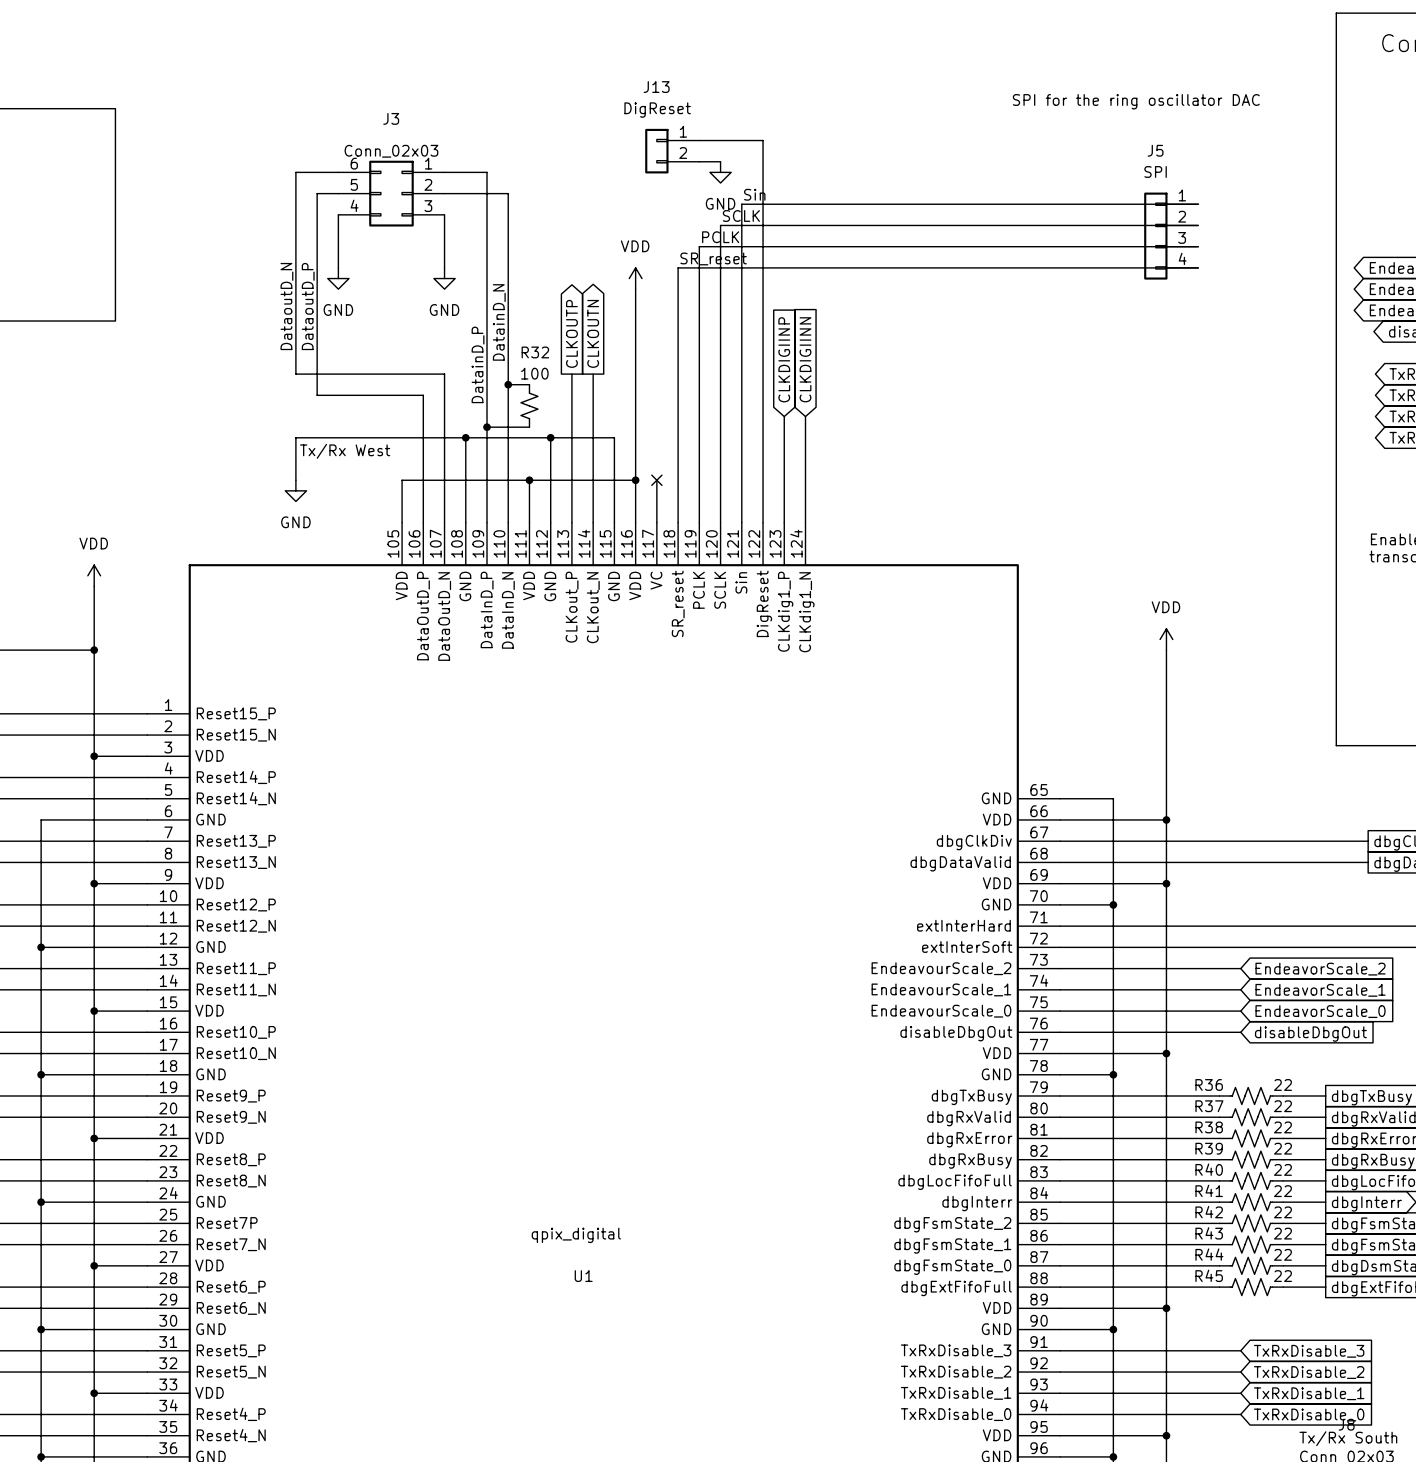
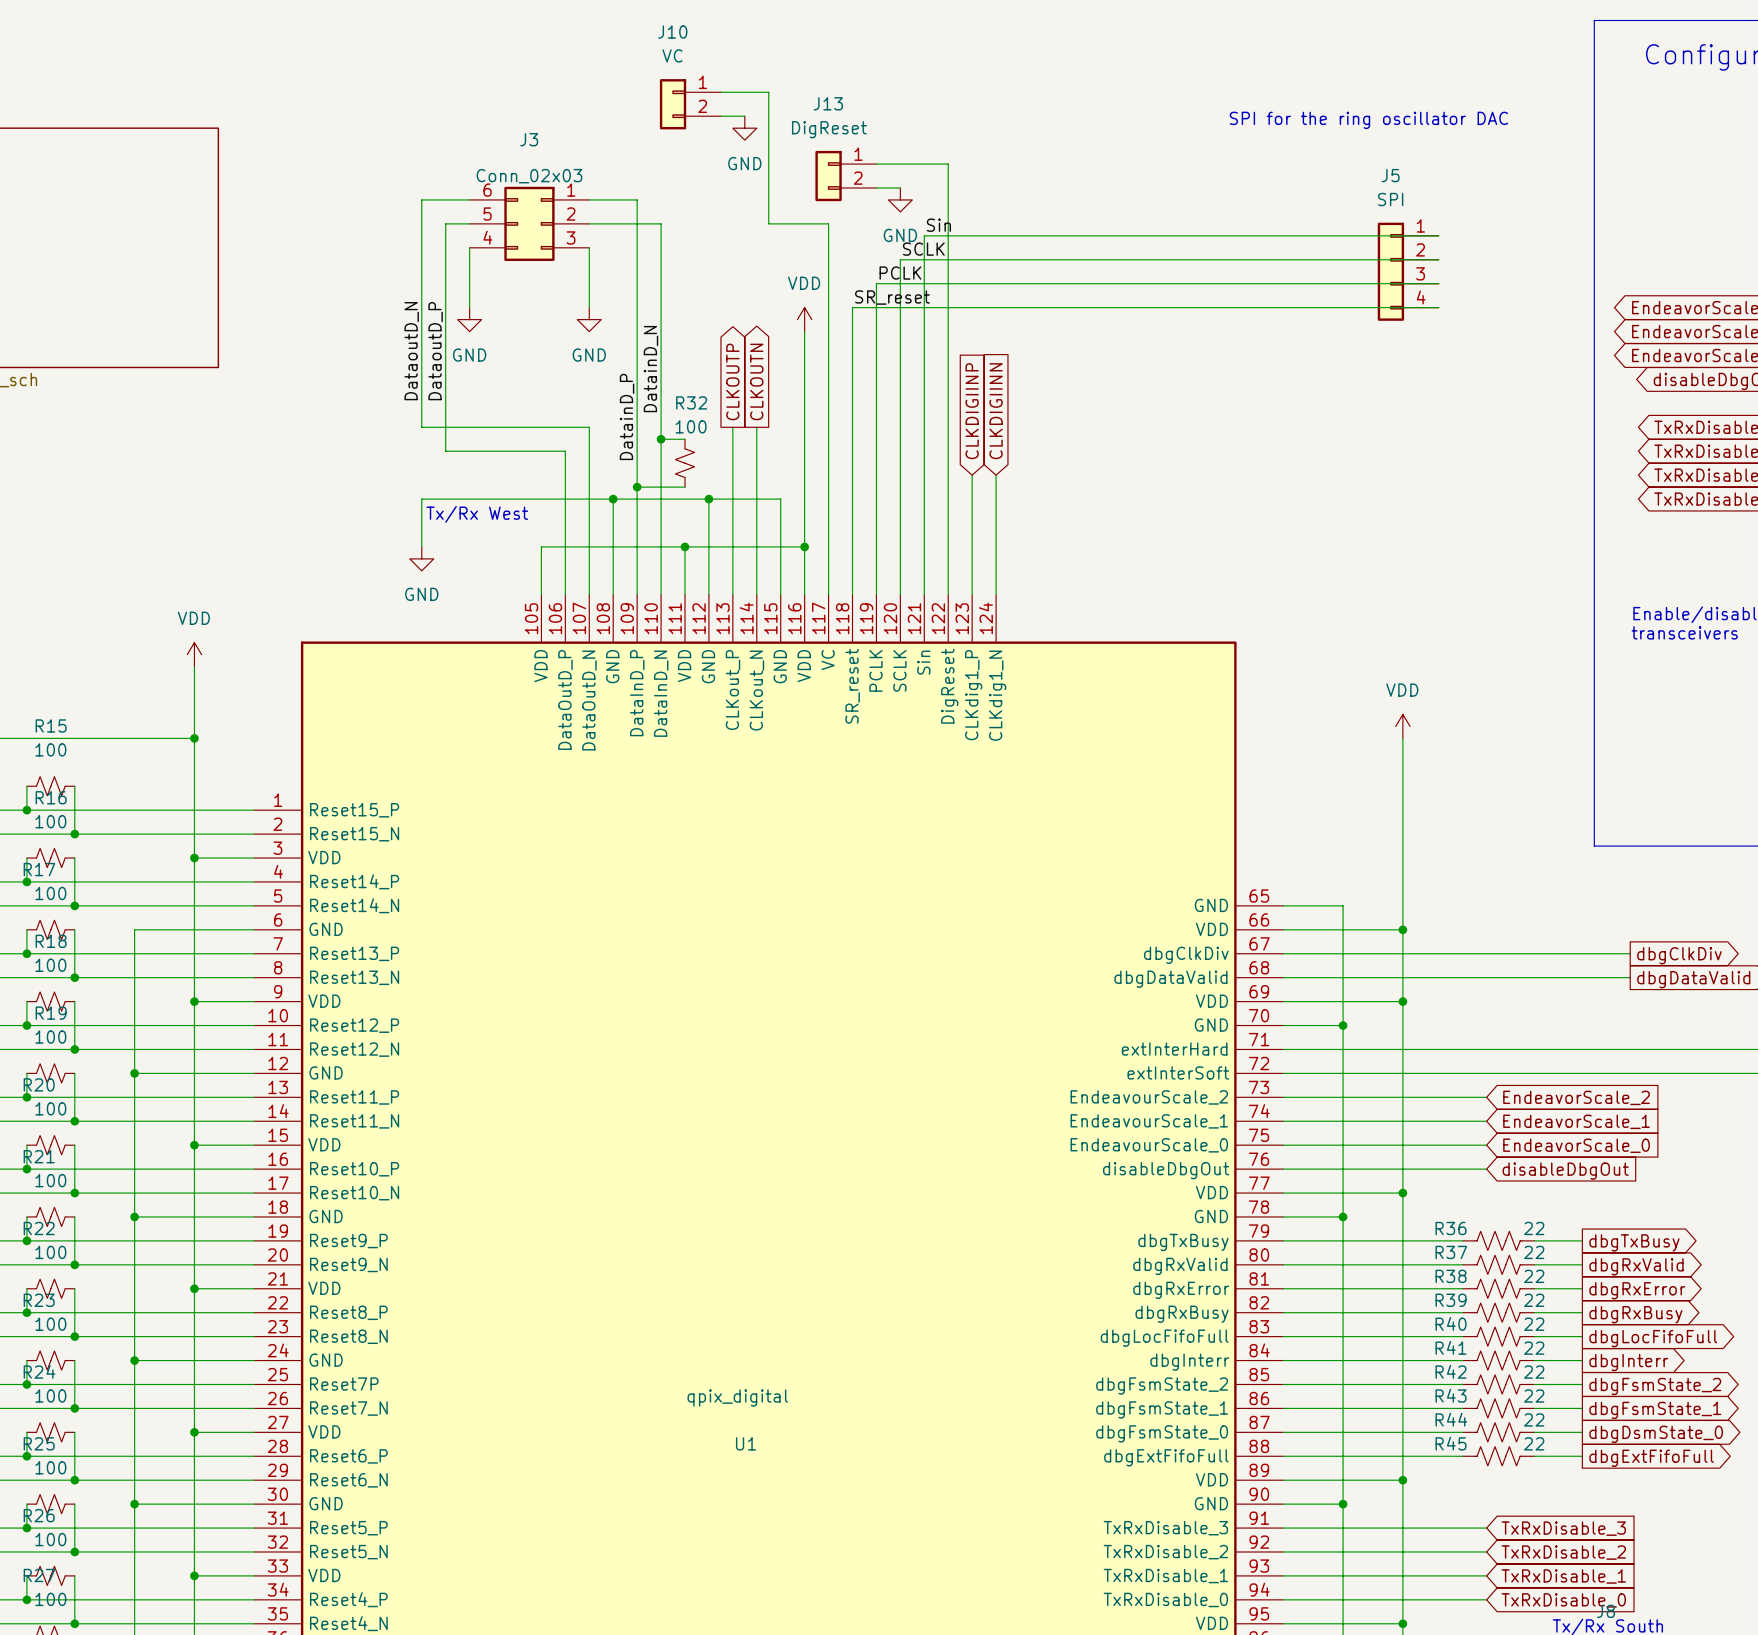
wire: none -> (720, 92) (768, 92) (768, 223) (828, 223) (828, 546)
J10: none -> VC (690, 104)
wire: none -> (720, 116) (744, 116)
power symbol: none -> GND (744, 128)
no-connect mark: (656, 480) -> none

